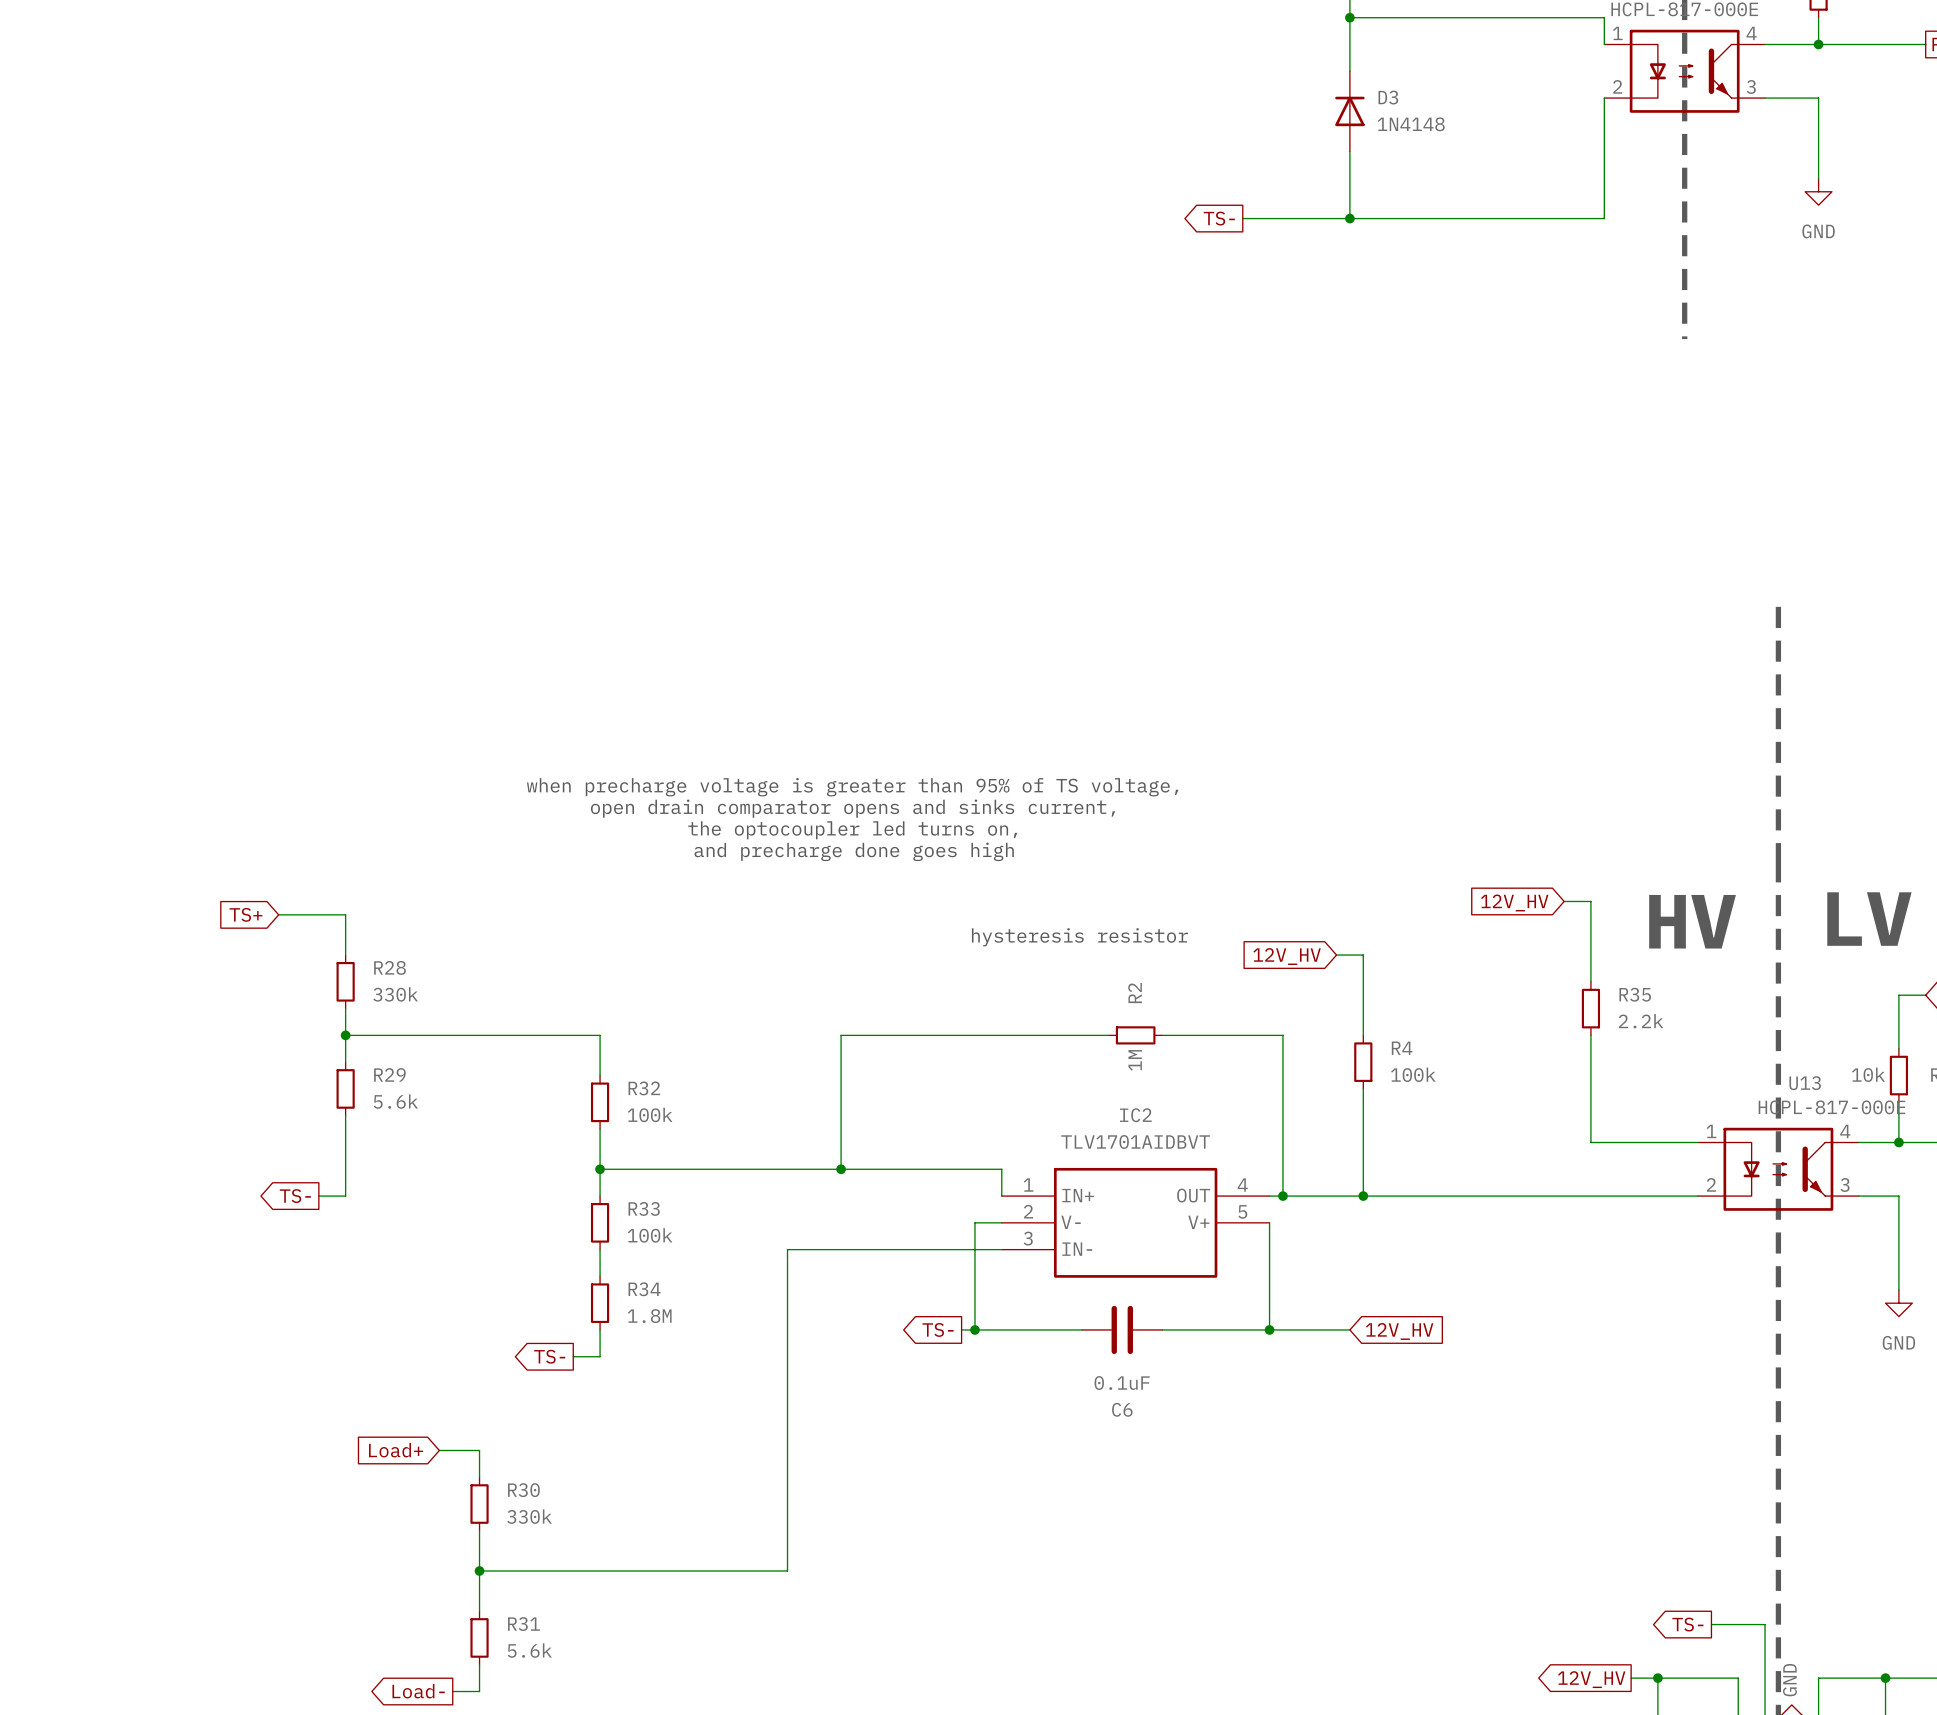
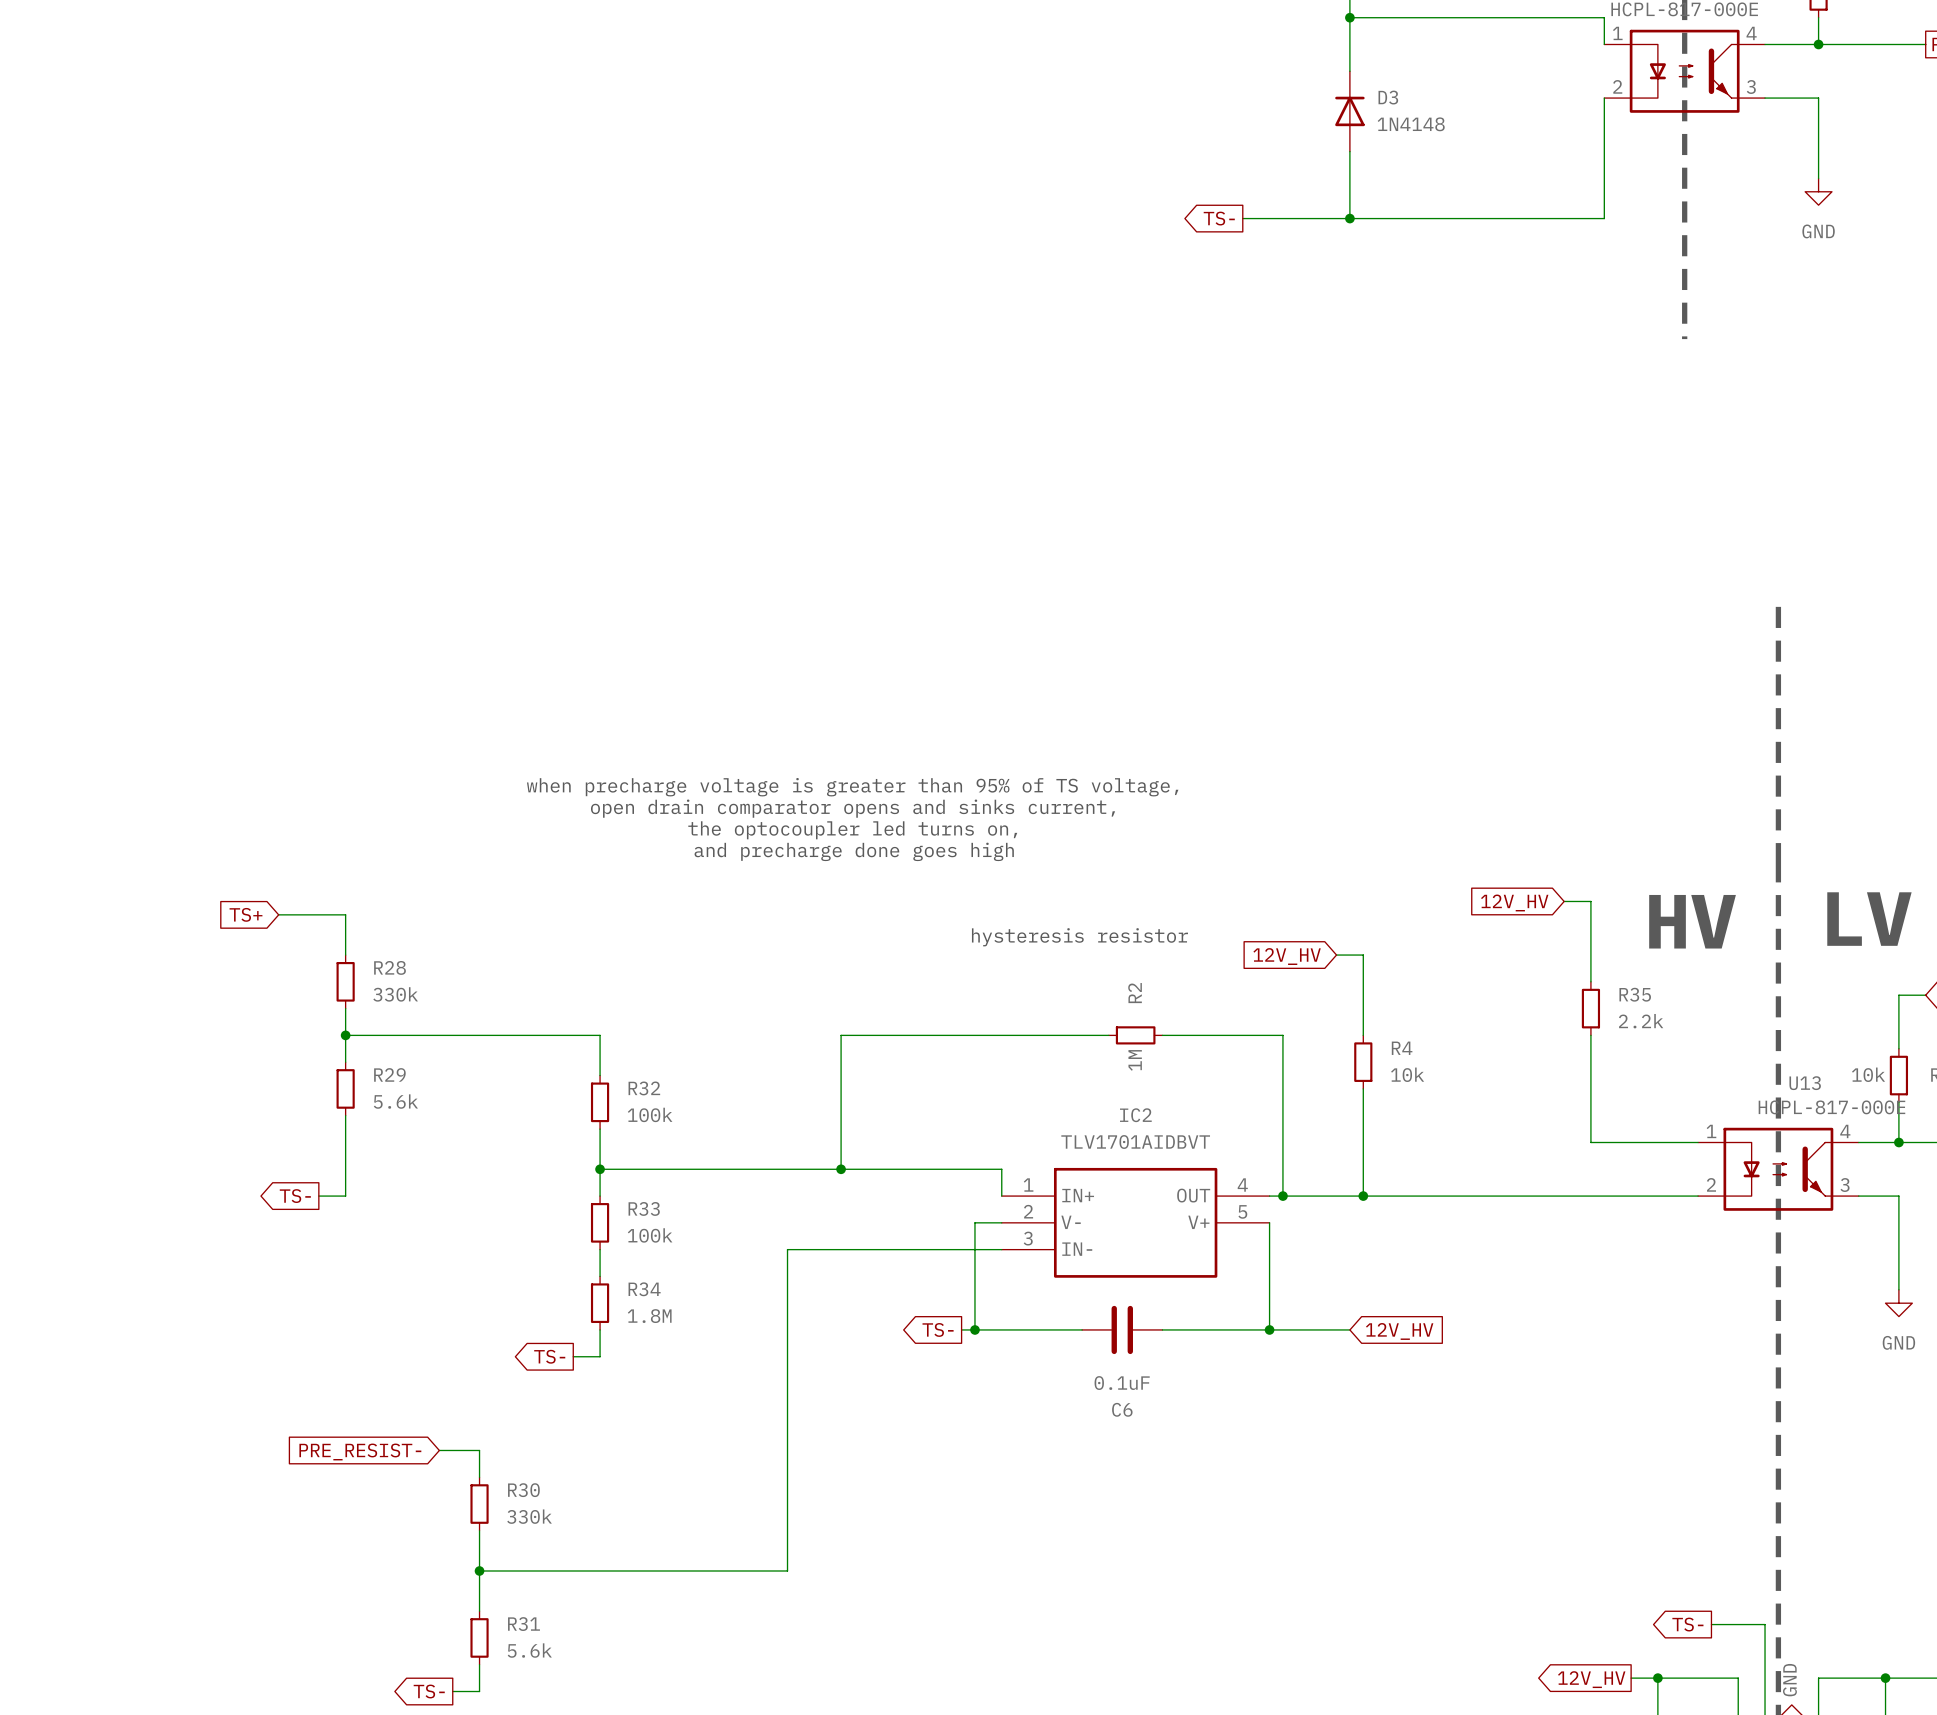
R4 value: 100k (1413, 1074) -> 10k (1407, 1074)
global label: Load+ (396, 1450) -> PRE_RESIST- (360, 1451)
global label: Load- (418, 1691) -> TS- (429, 1691)

